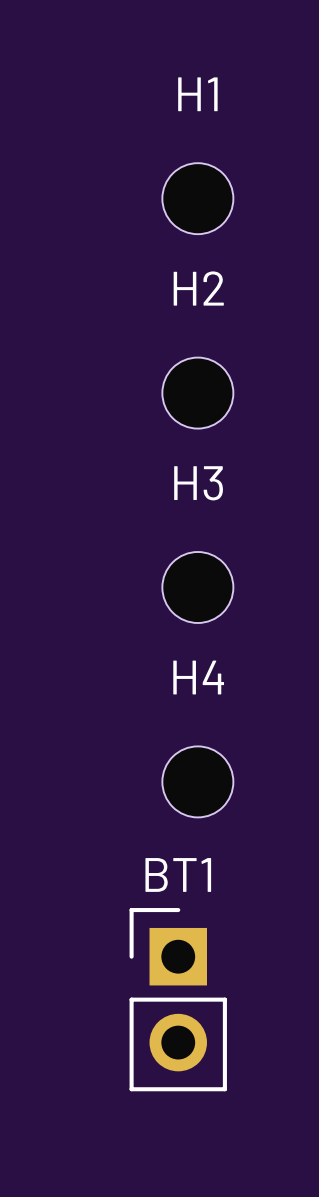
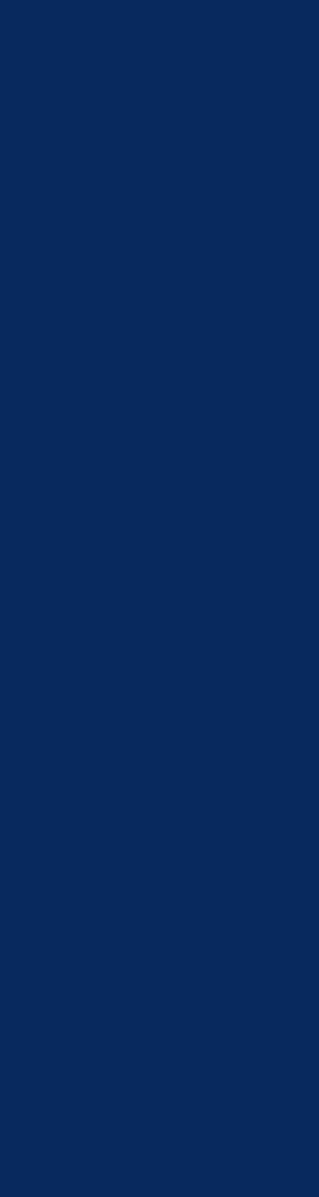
H1: (197, 198) -> none
H2: (197, 393) -> none
H3: (197, 587) -> none
H4: (197, 781) -> none
BT1: (178, 999) -> none

